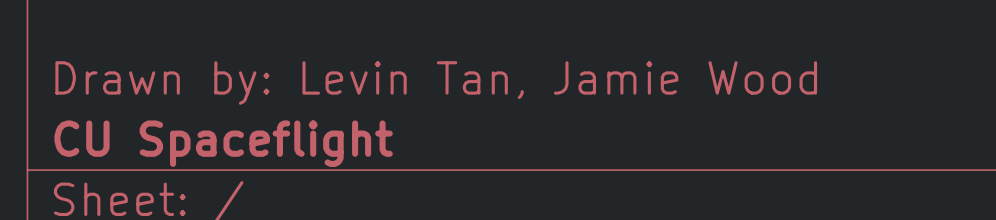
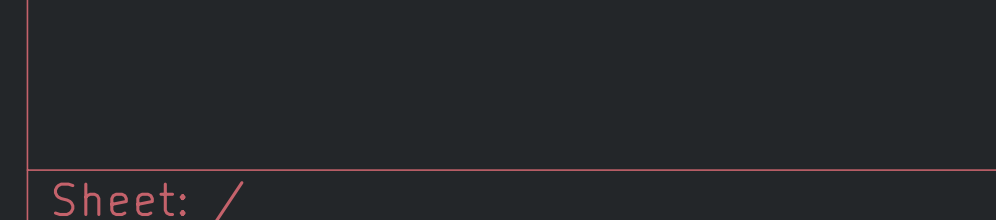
title block: Drawn by: Levin Tan, Jamie Wood (436, 83) -> none
title block: CU Spaceflight (223, 143) -> none

